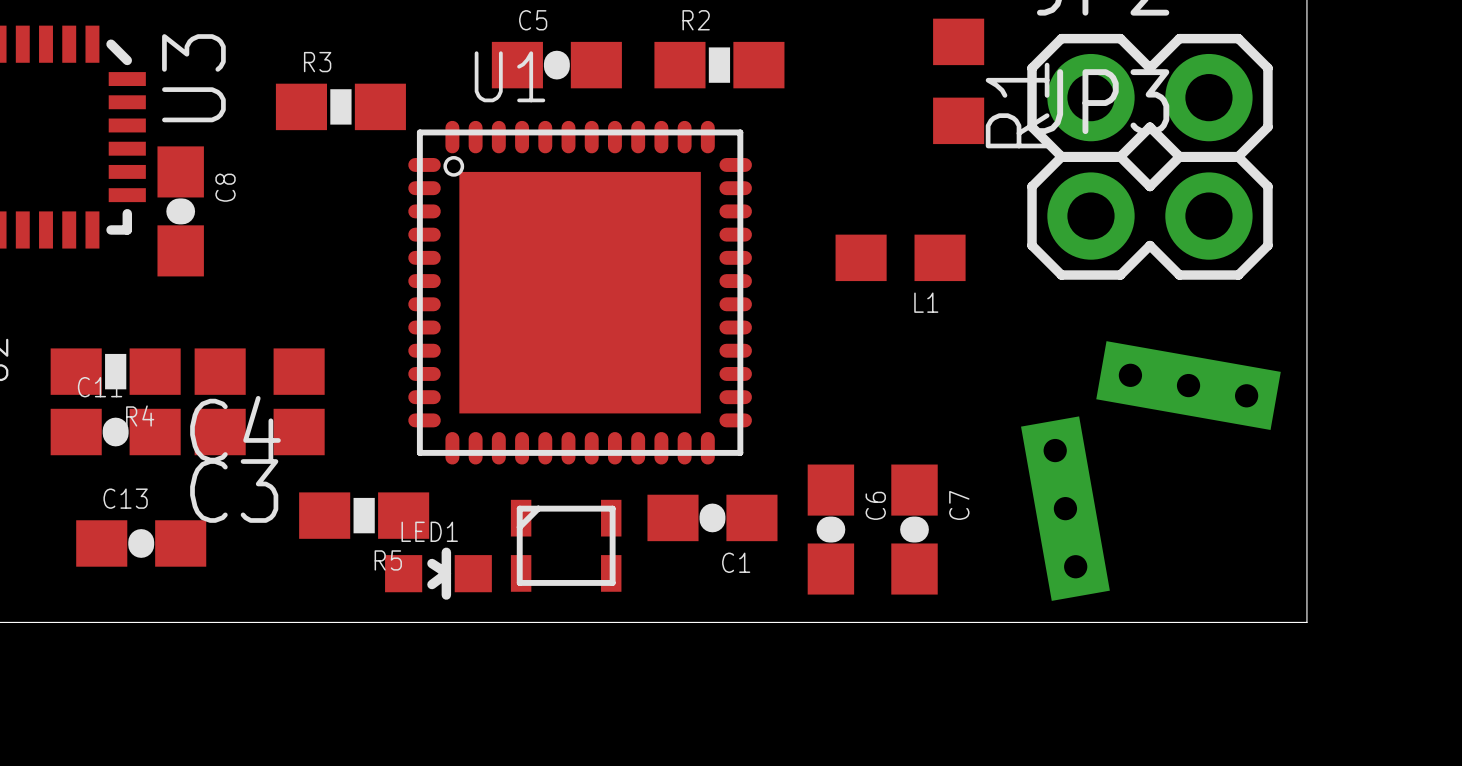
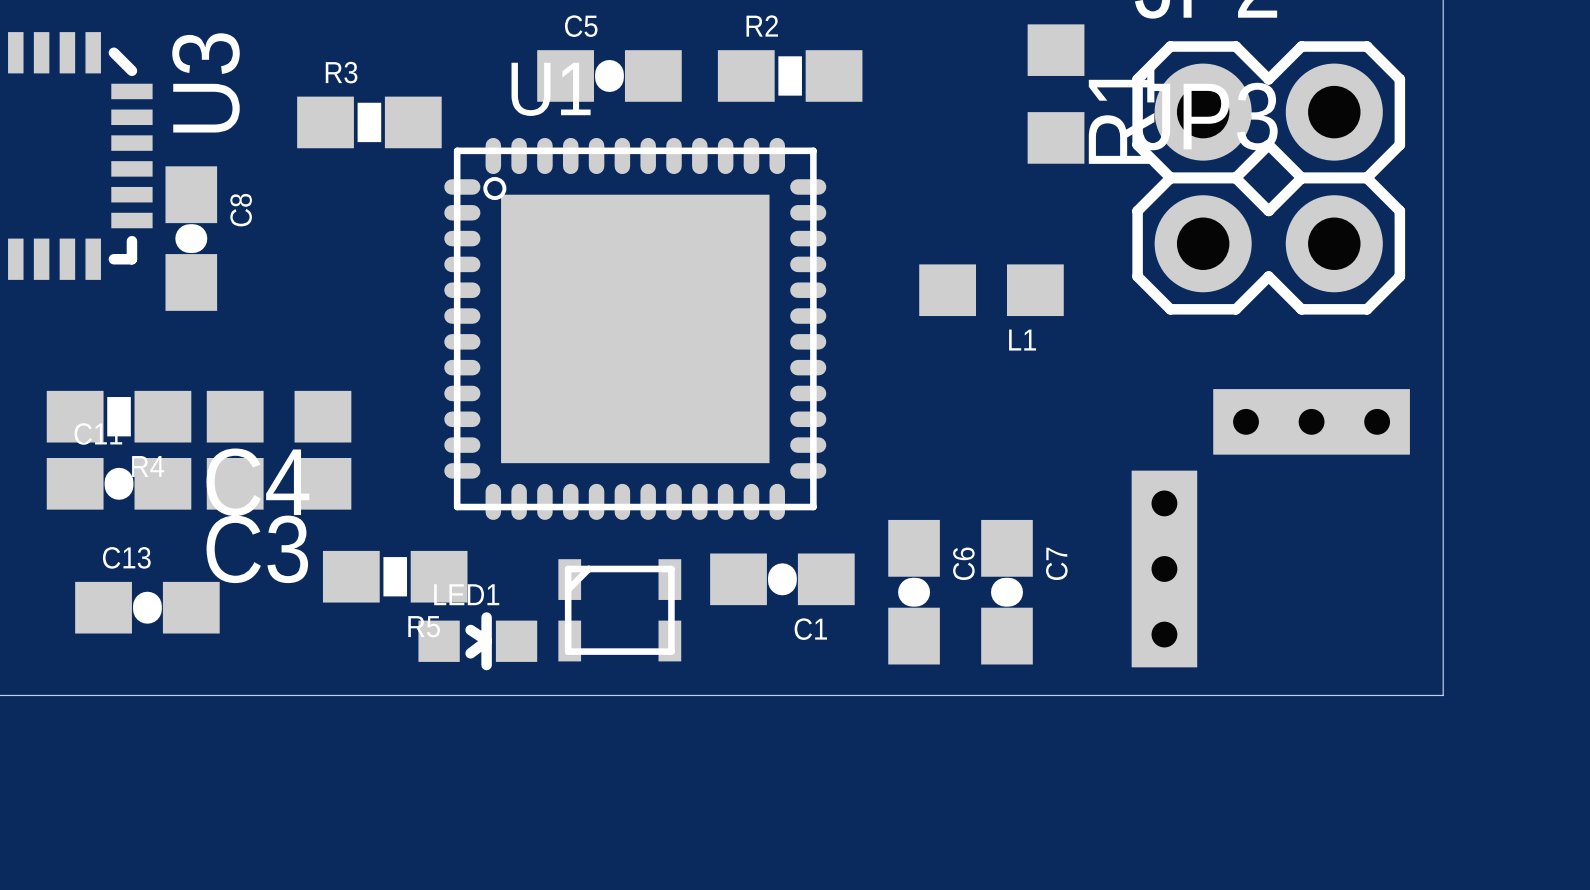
part rotation: 0° (1188, 385) -> 10° counterclockwise (1311, 421)
part rotation: 0° (1065, 508) -> 10° clockwise (1164, 568)

